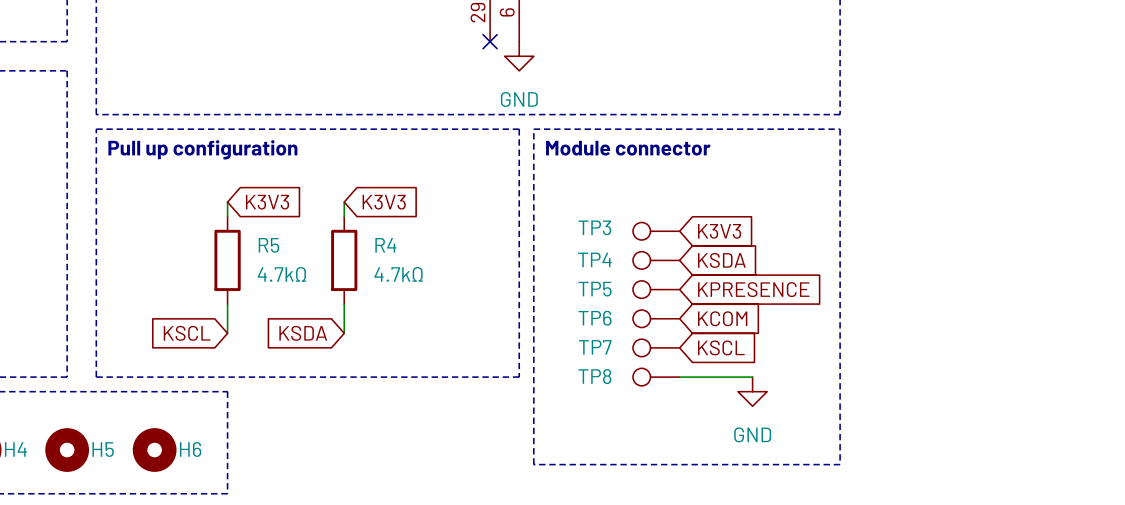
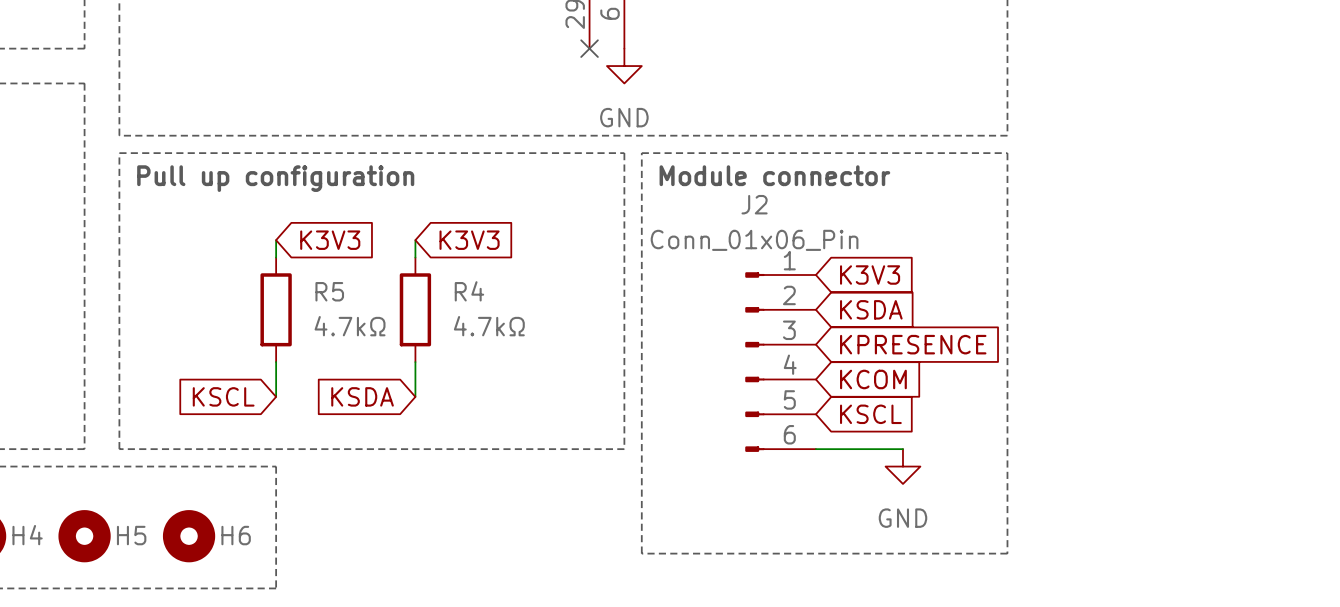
TP3: (656, 231) -> none
TP4: (656, 260) -> none
TP5: (656, 289) -> none
J2: none -> Conn_01x06_Pin (780, 362)
TP6: (656, 318) -> none
TP7: (656, 347) -> none
TP8: (656, 377) -> none

